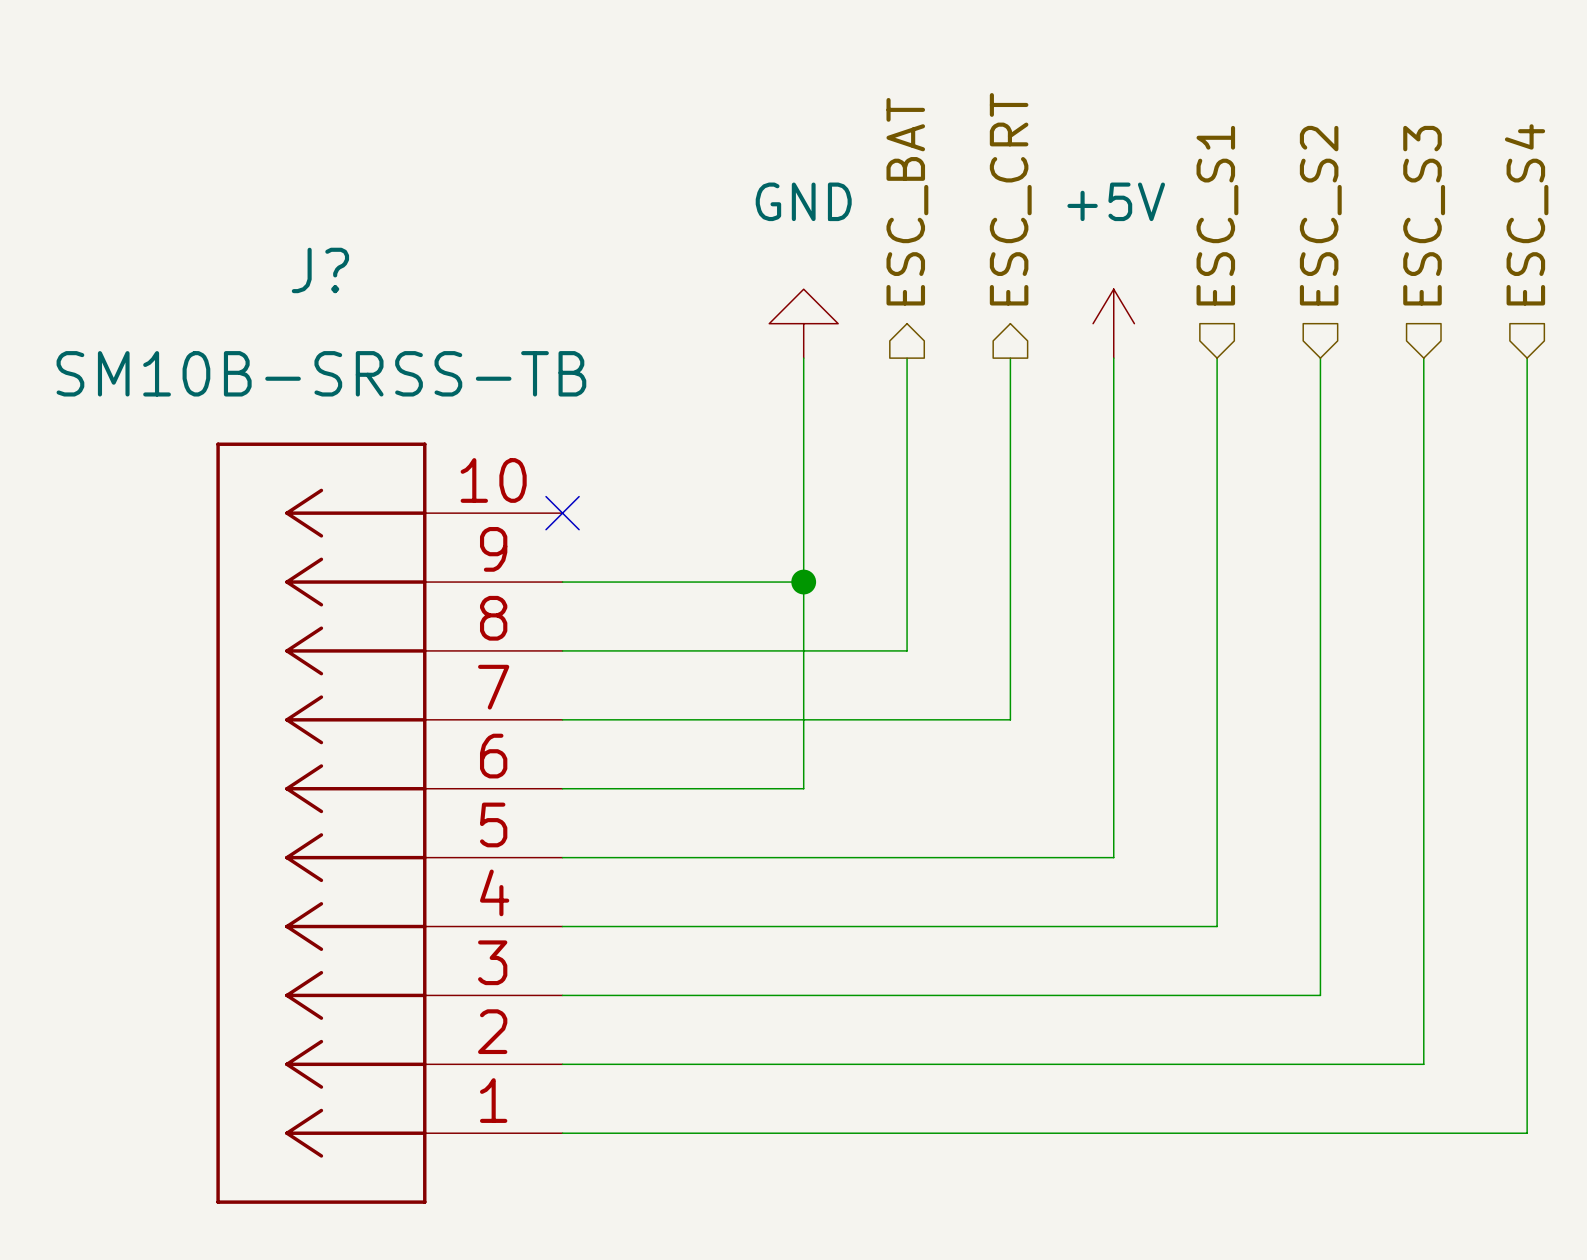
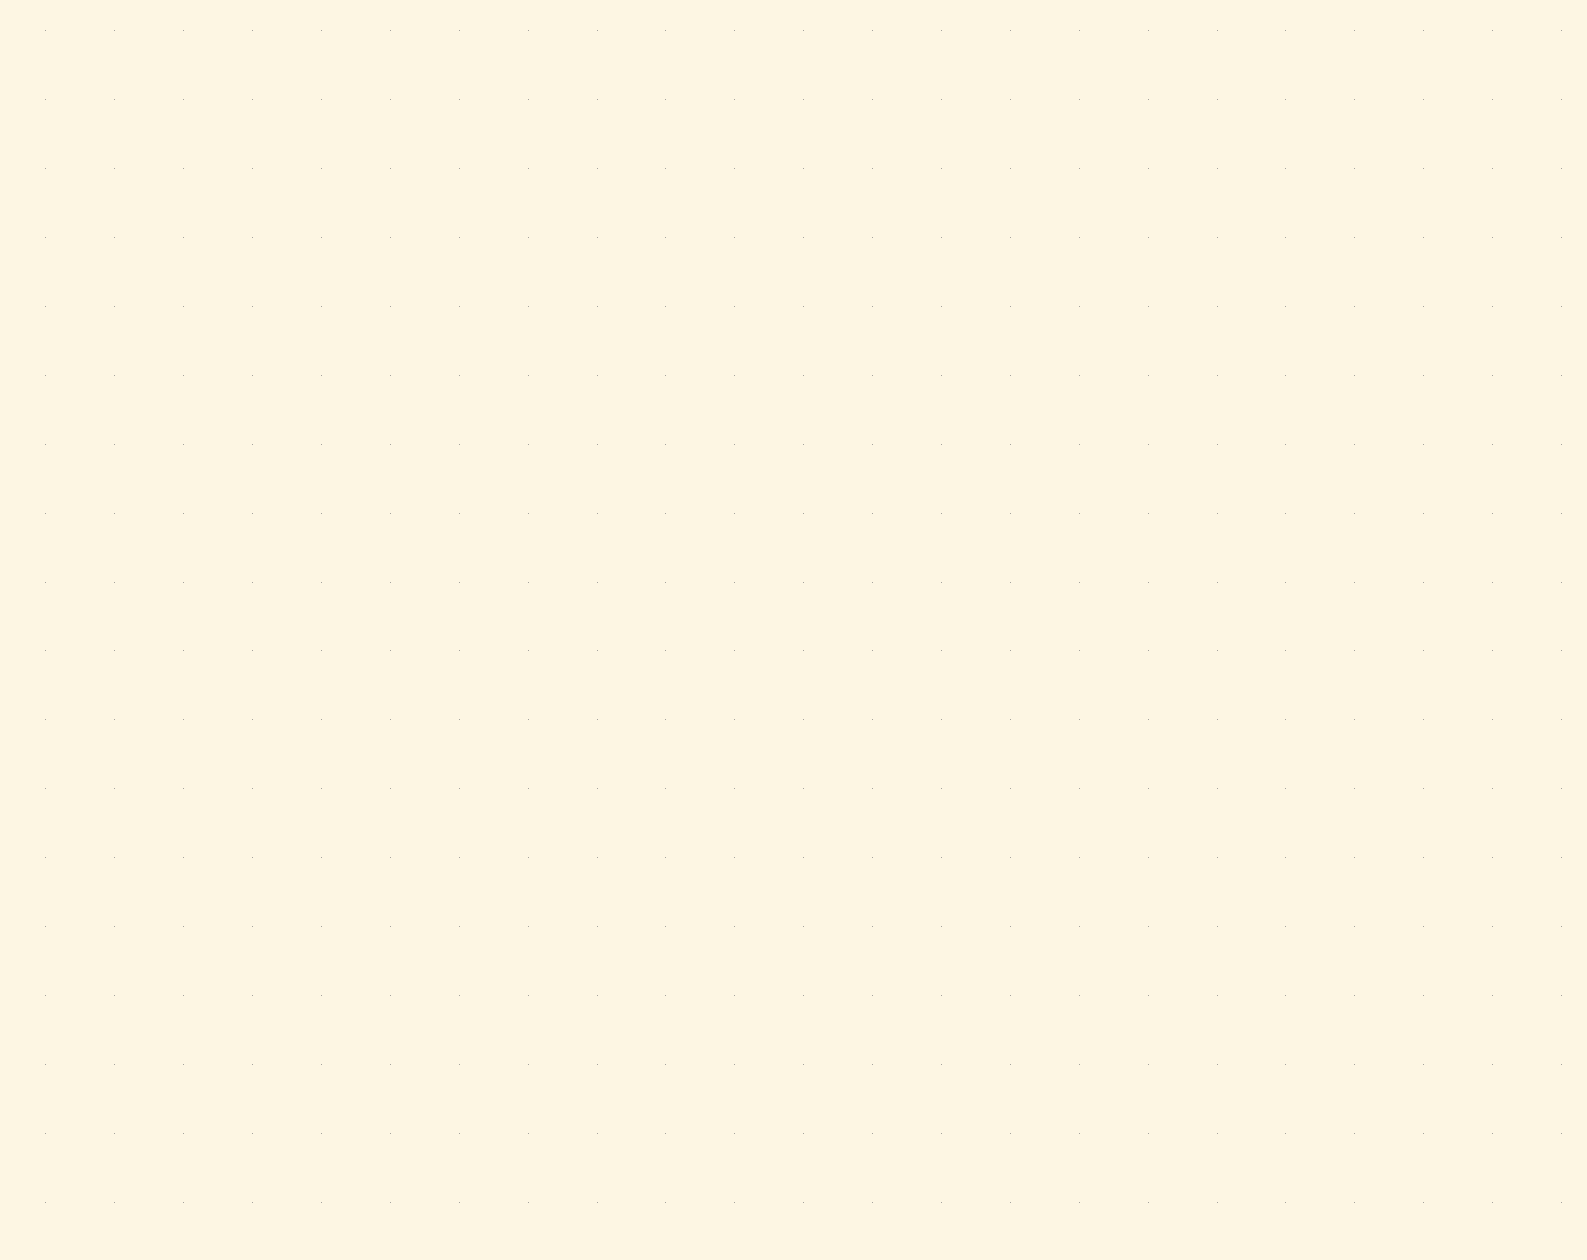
hierarchical label: ESC_CRT (1010, 199) -> none
hierarchical label: ESC_BAT (907, 201) -> none
hierarchical label: ESC_S4 (1526, 214) -> none
hierarchical label: ESC_S1 (1217, 215) -> none
hierarchical label: ESC_S2 (1320, 215) -> none
hierarchical label: ESC_S3 (1424, 215) -> none
power symbol: GND (803, 323) -> none
power symbol: +5V (1113, 323) -> none
wire: (803, 358) (803, 788) (562, 788) -> none
wire: (907, 358) (907, 650) (562, 650) -> none
wire: (1010, 358) (1010, 719) (562, 719) -> none
wire: (1113, 358) (1113, 857) (562, 857) -> none
wire: (1217, 358) (1217, 926) (562, 926) -> none
wire: (1320, 358) (1320, 995) (562, 995) -> none
wire: (1423, 358) (1423, 1064) (562, 1064) -> none
wire: (1527, 358) (1527, 1133) (562, 1133) -> none
no-connect mark: (562, 513) -> none
wire: (562, 582) (803, 582) -> none
junction: (803, 582) -> none
J?: SM10B-SRSS-TB (389, 823) -> none

